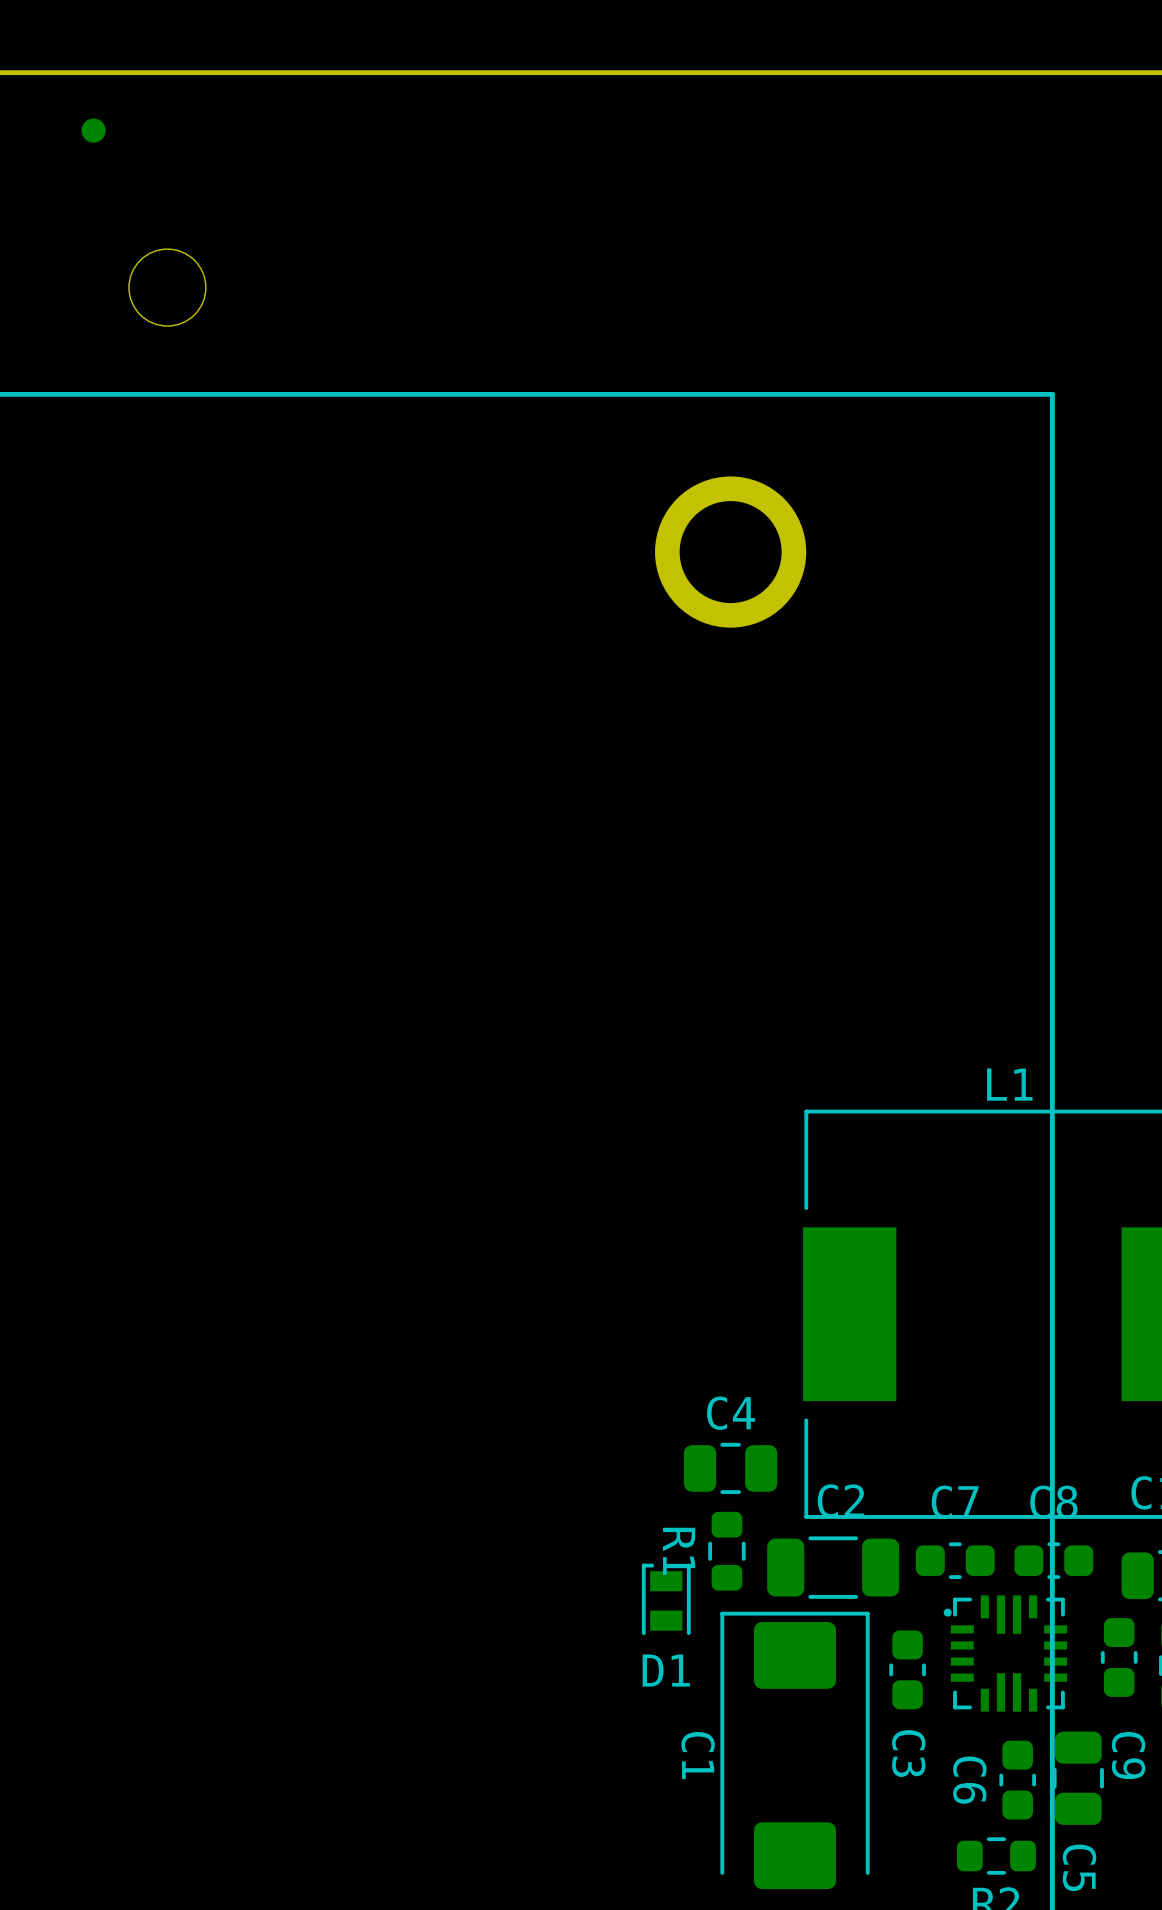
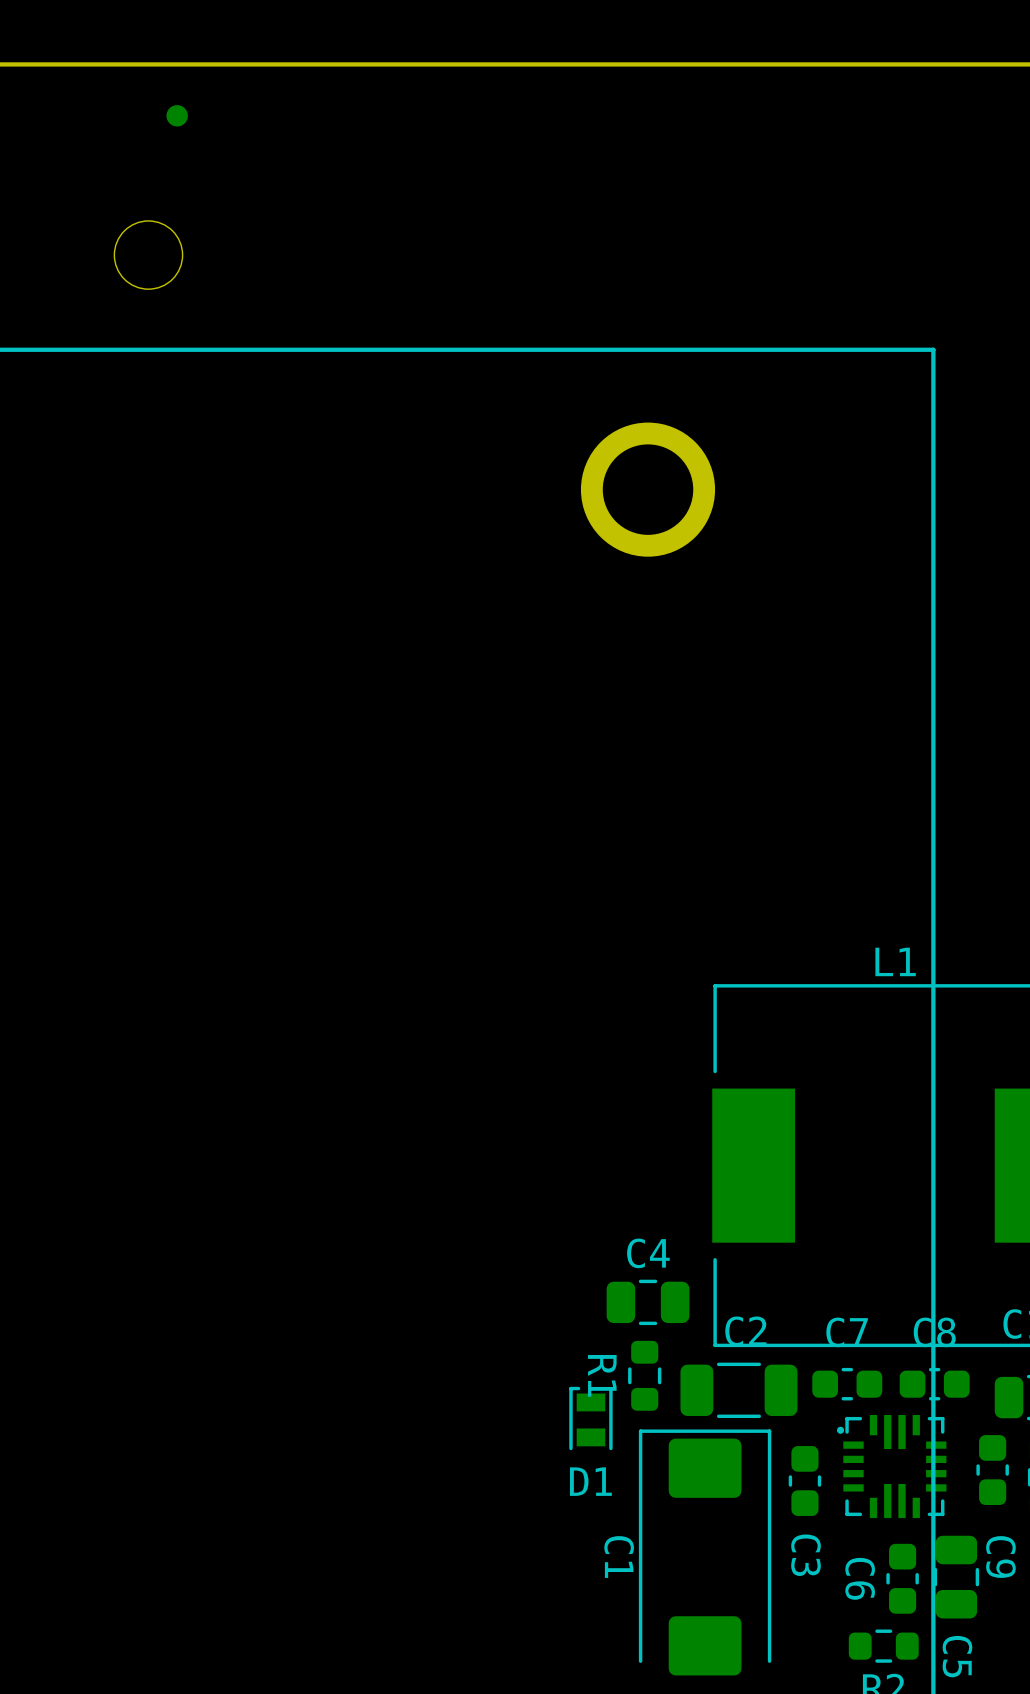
part position: (93, 130) -> (177, 115)

